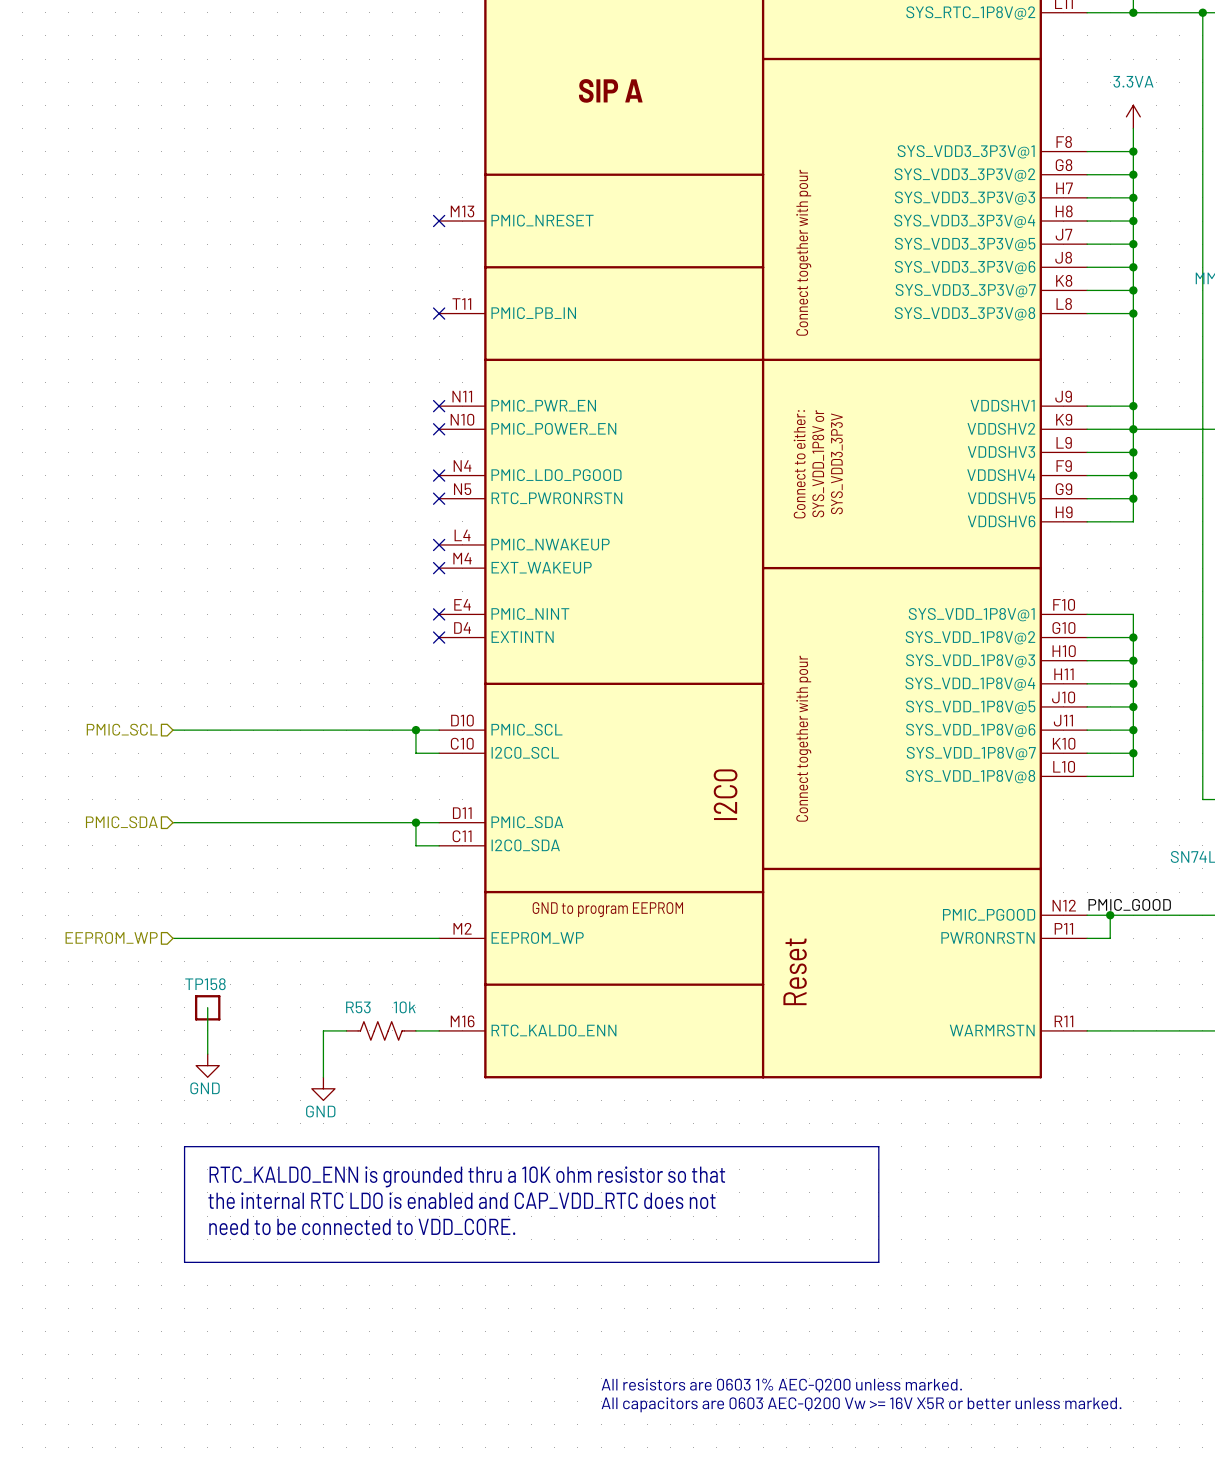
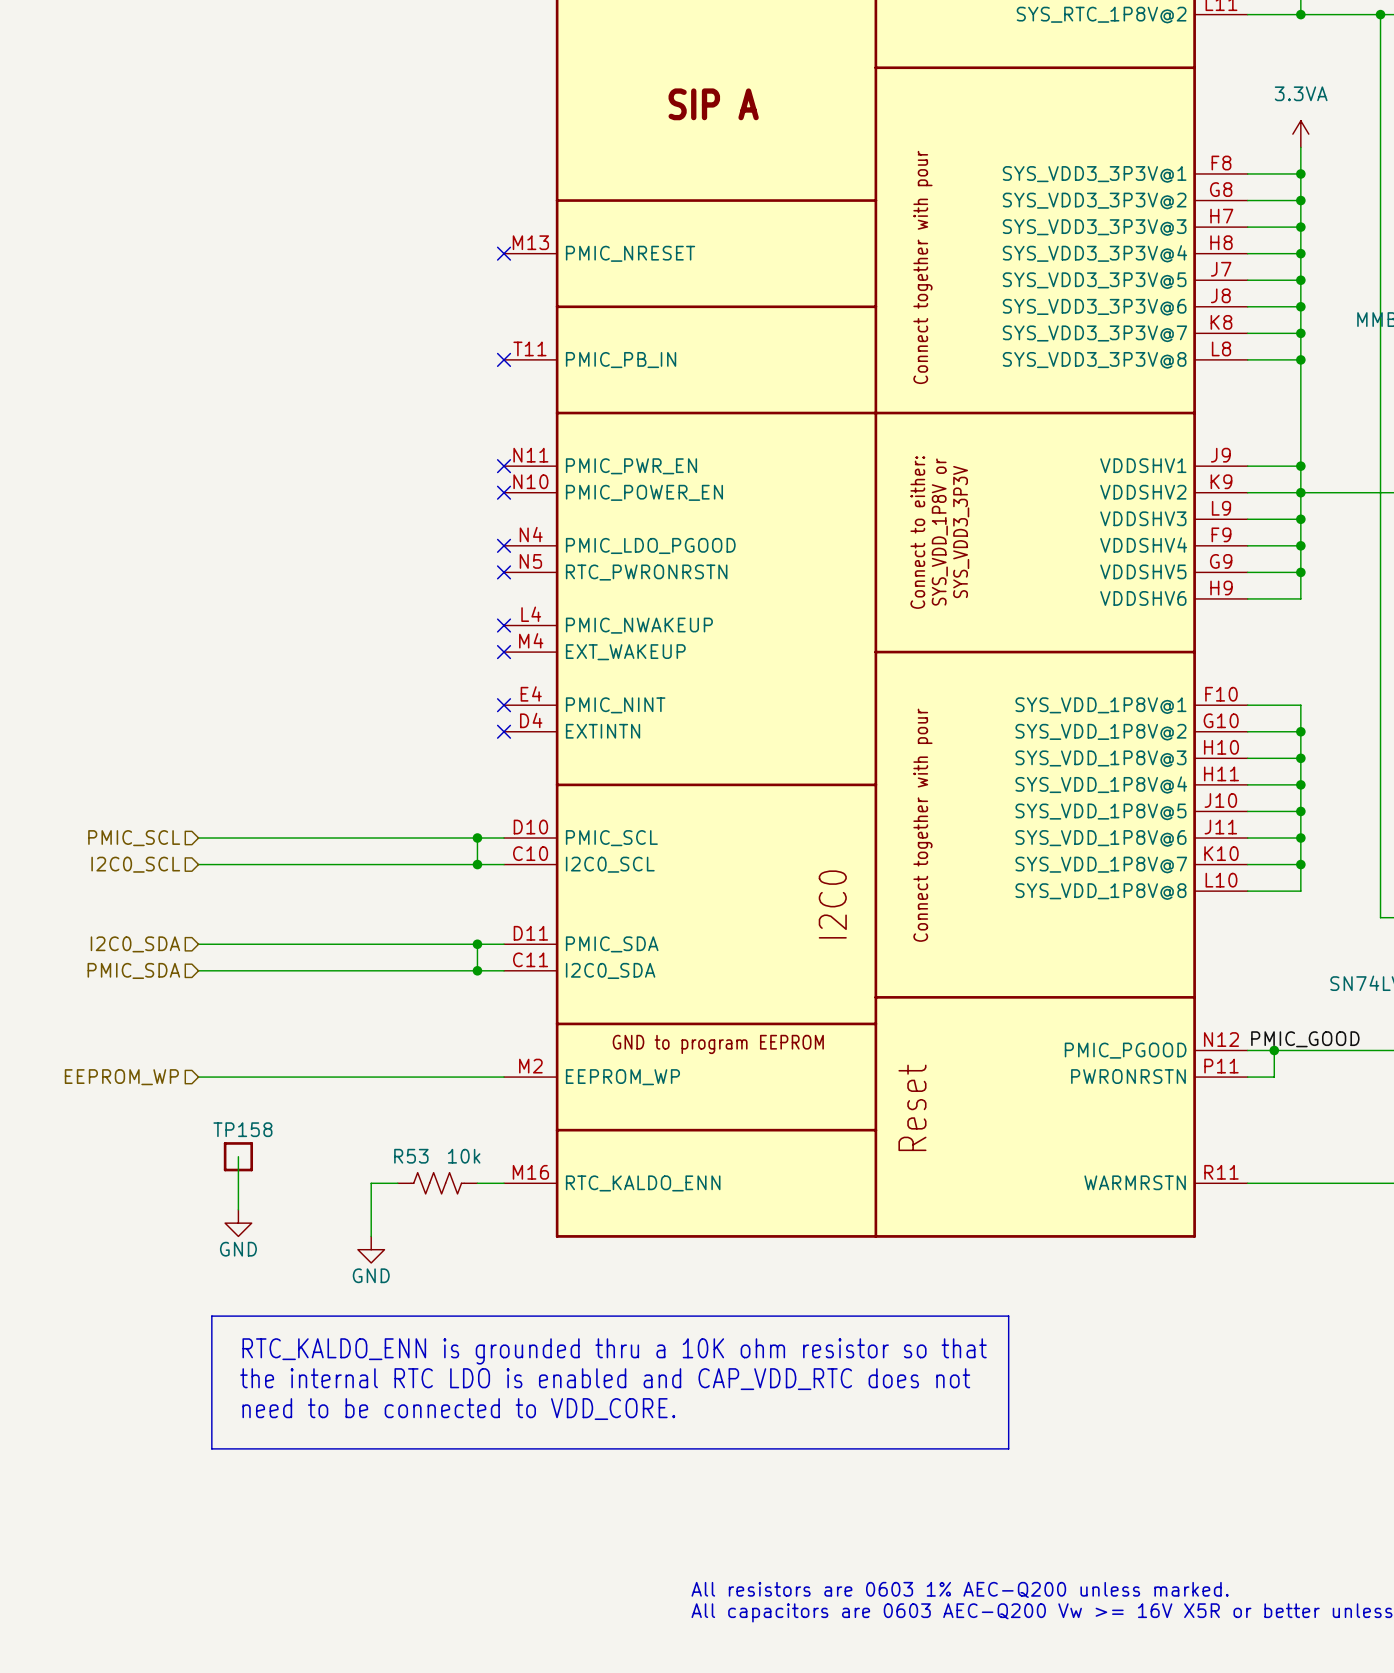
hierarchical label: none -> I2C0_SCL (135, 864)
wire: none -> (198, 864) (477, 864)
junction: none -> (477, 864)
hierarchical label: PMIC_SDA (121, 822) -> I2C0_SDA (135, 944)
hierarchical label: none -> PMIC_SDA (133, 970)
wire: none -> (198, 970) (477, 970)
junction: none -> (477, 970)

